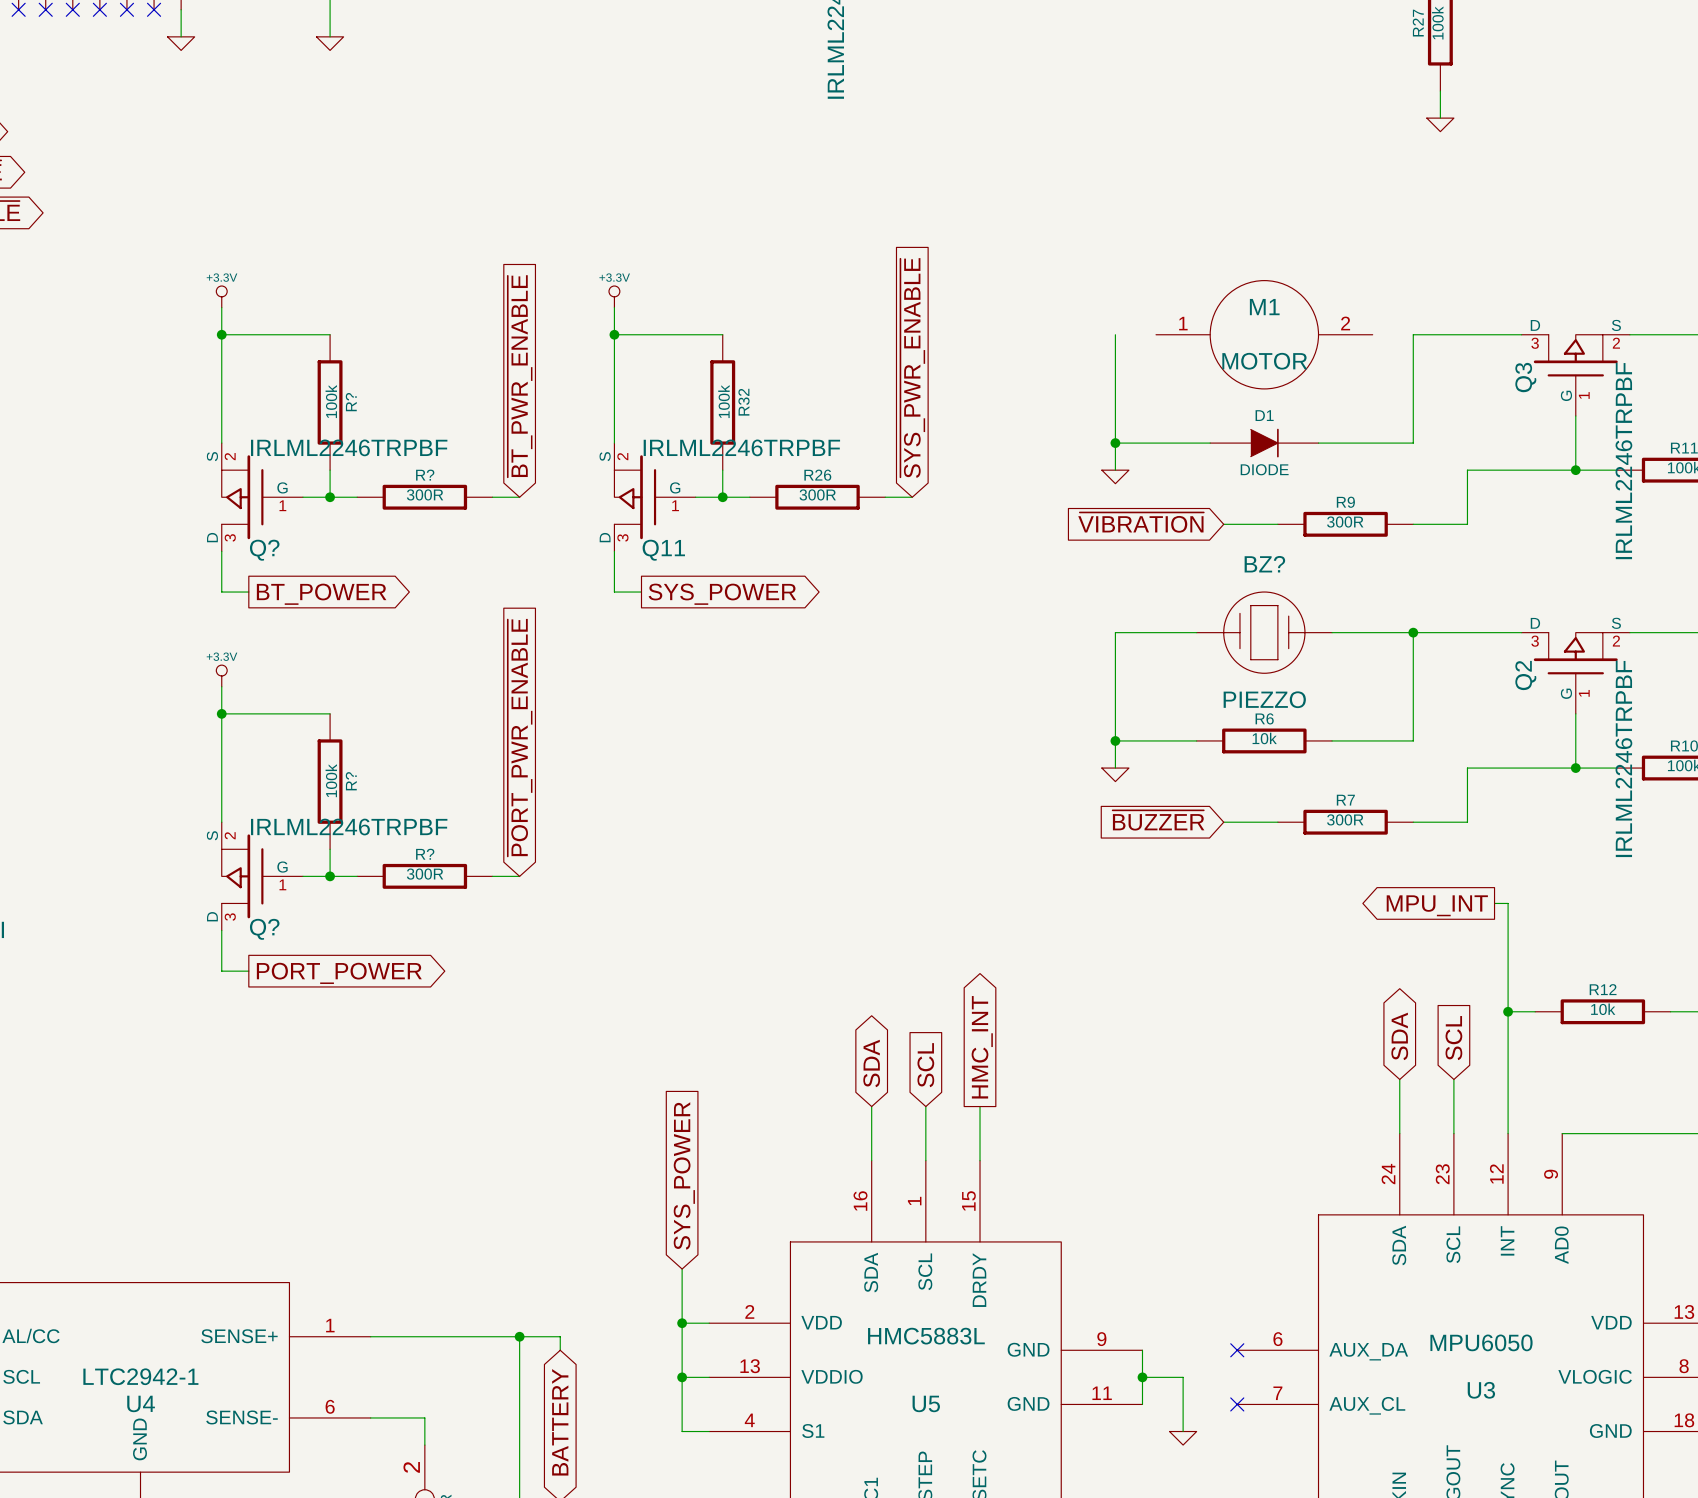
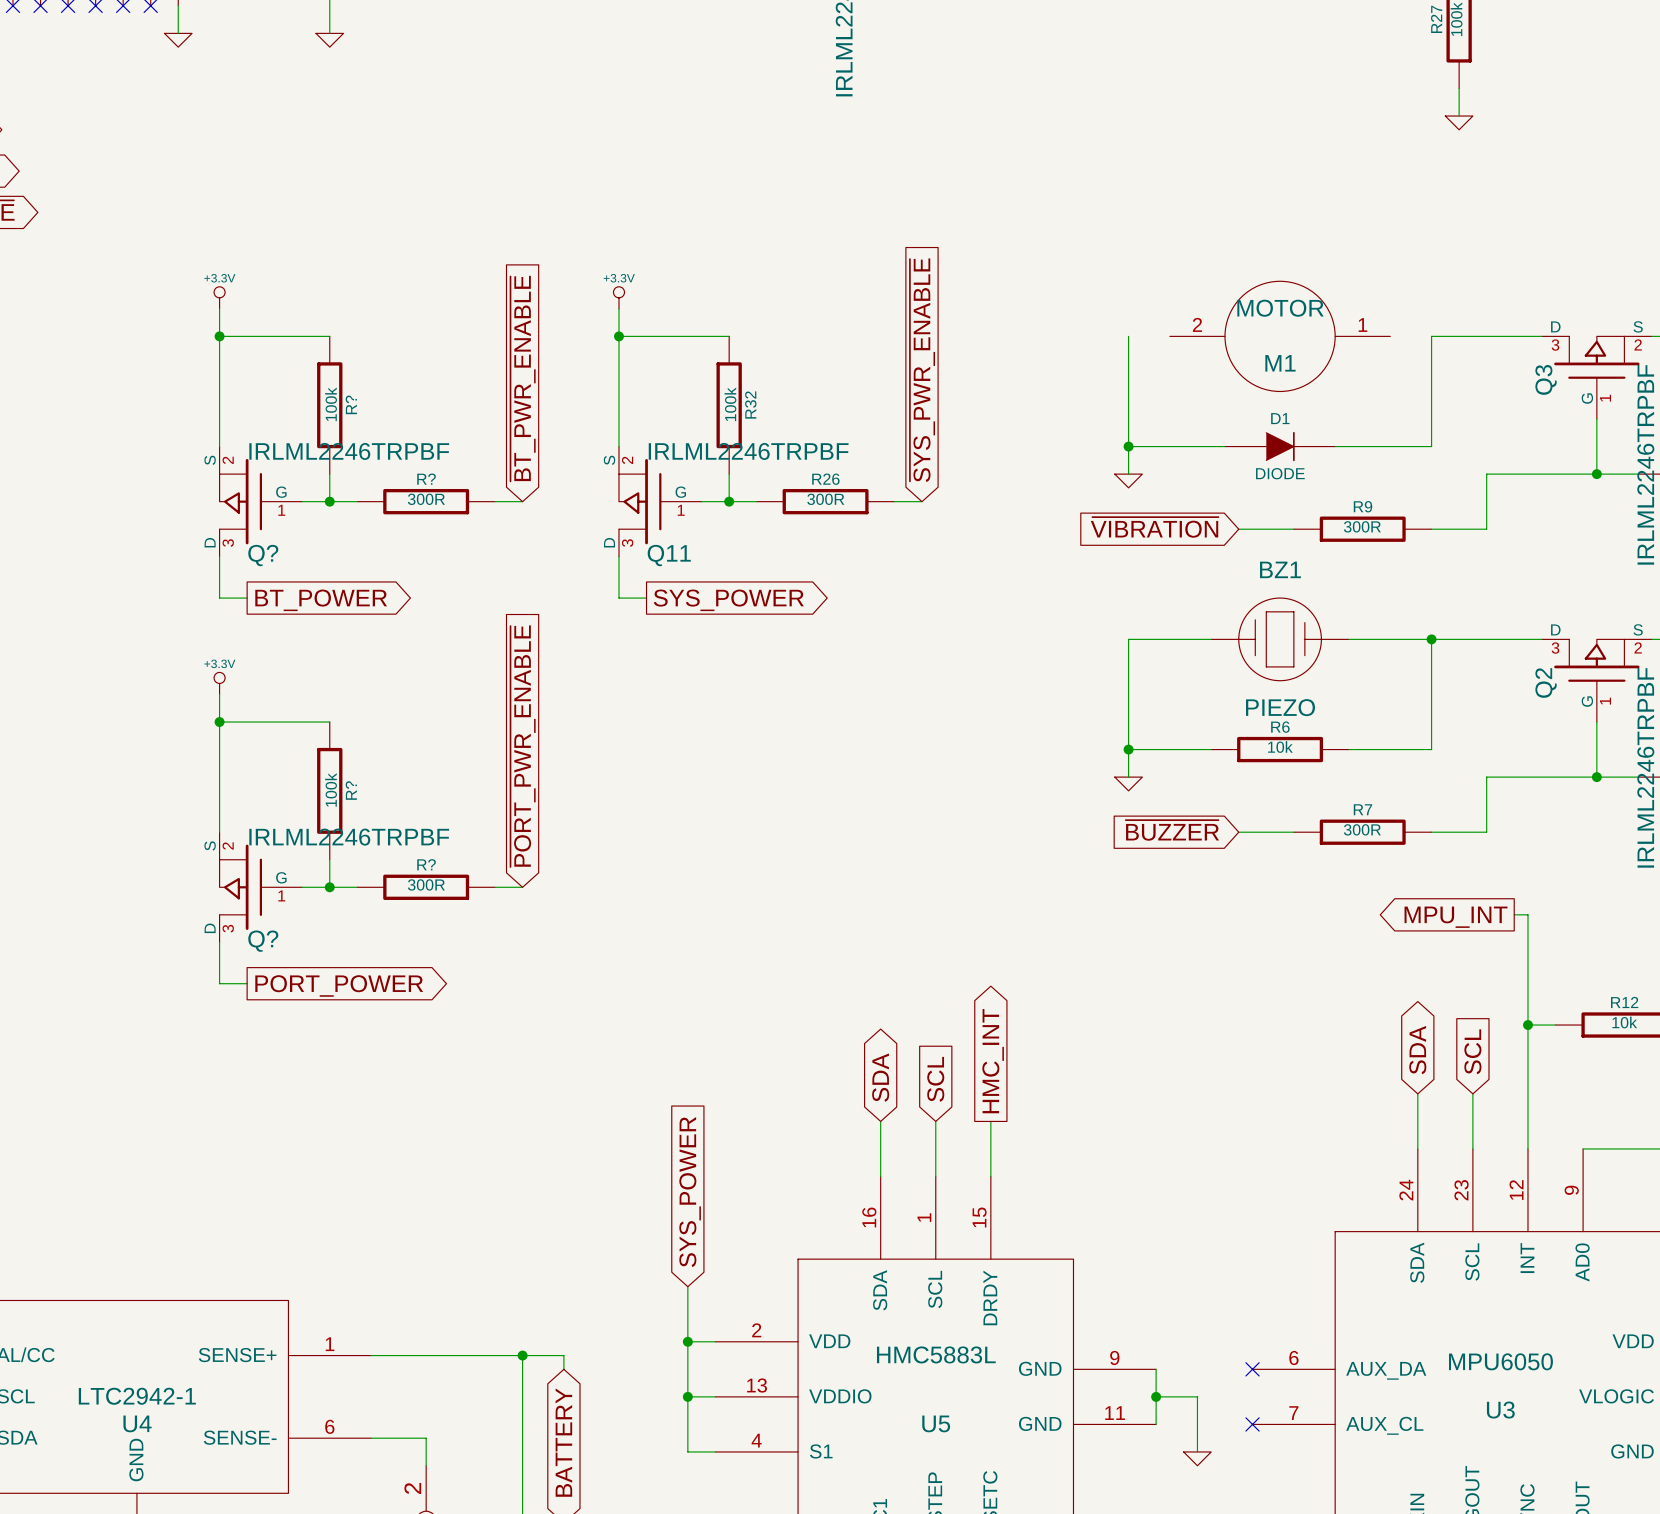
M1 rotation: 0° (1264, 334) -> 180° (1280, 336)
BZ? name: BZ? (1264, 564) -> BZ1 (1280, 569)
BZ? value: PIEZZO (1264, 699) -> PIEZO (1280, 707)

